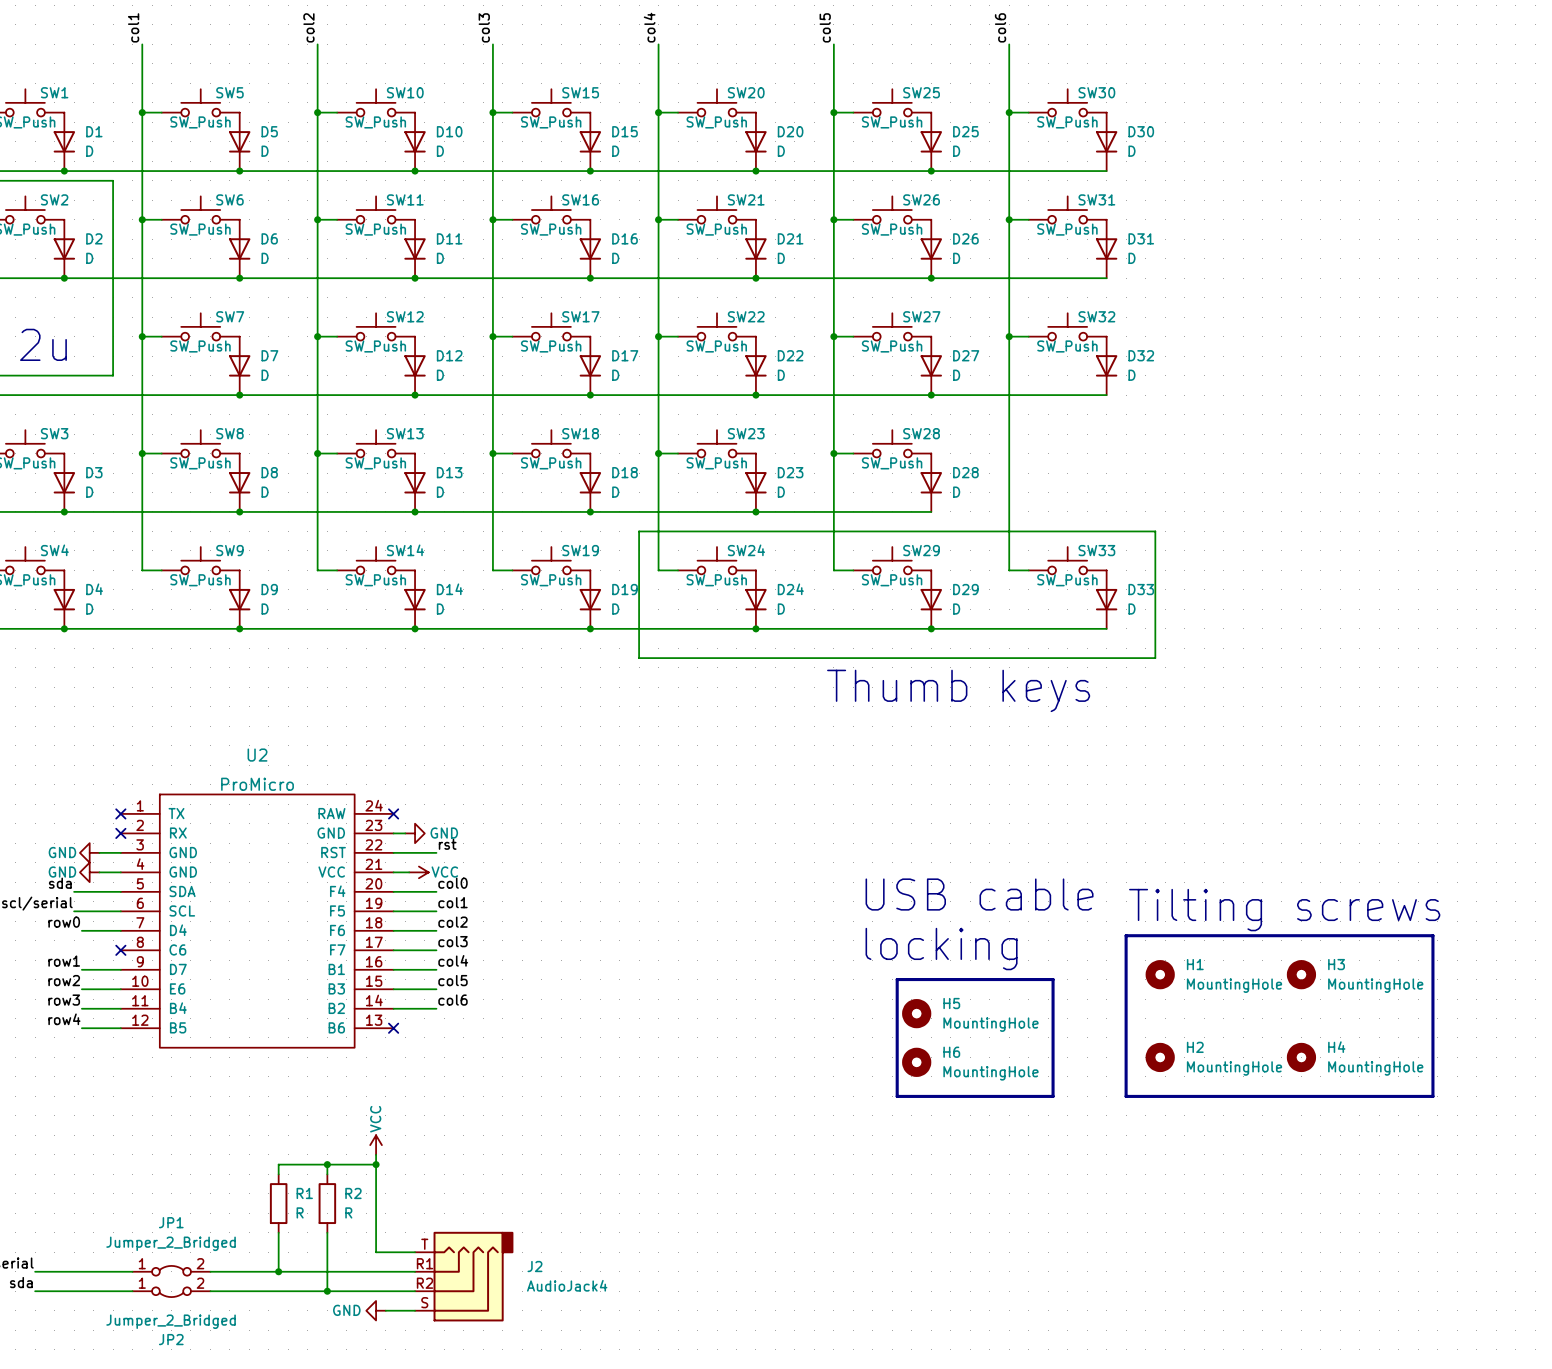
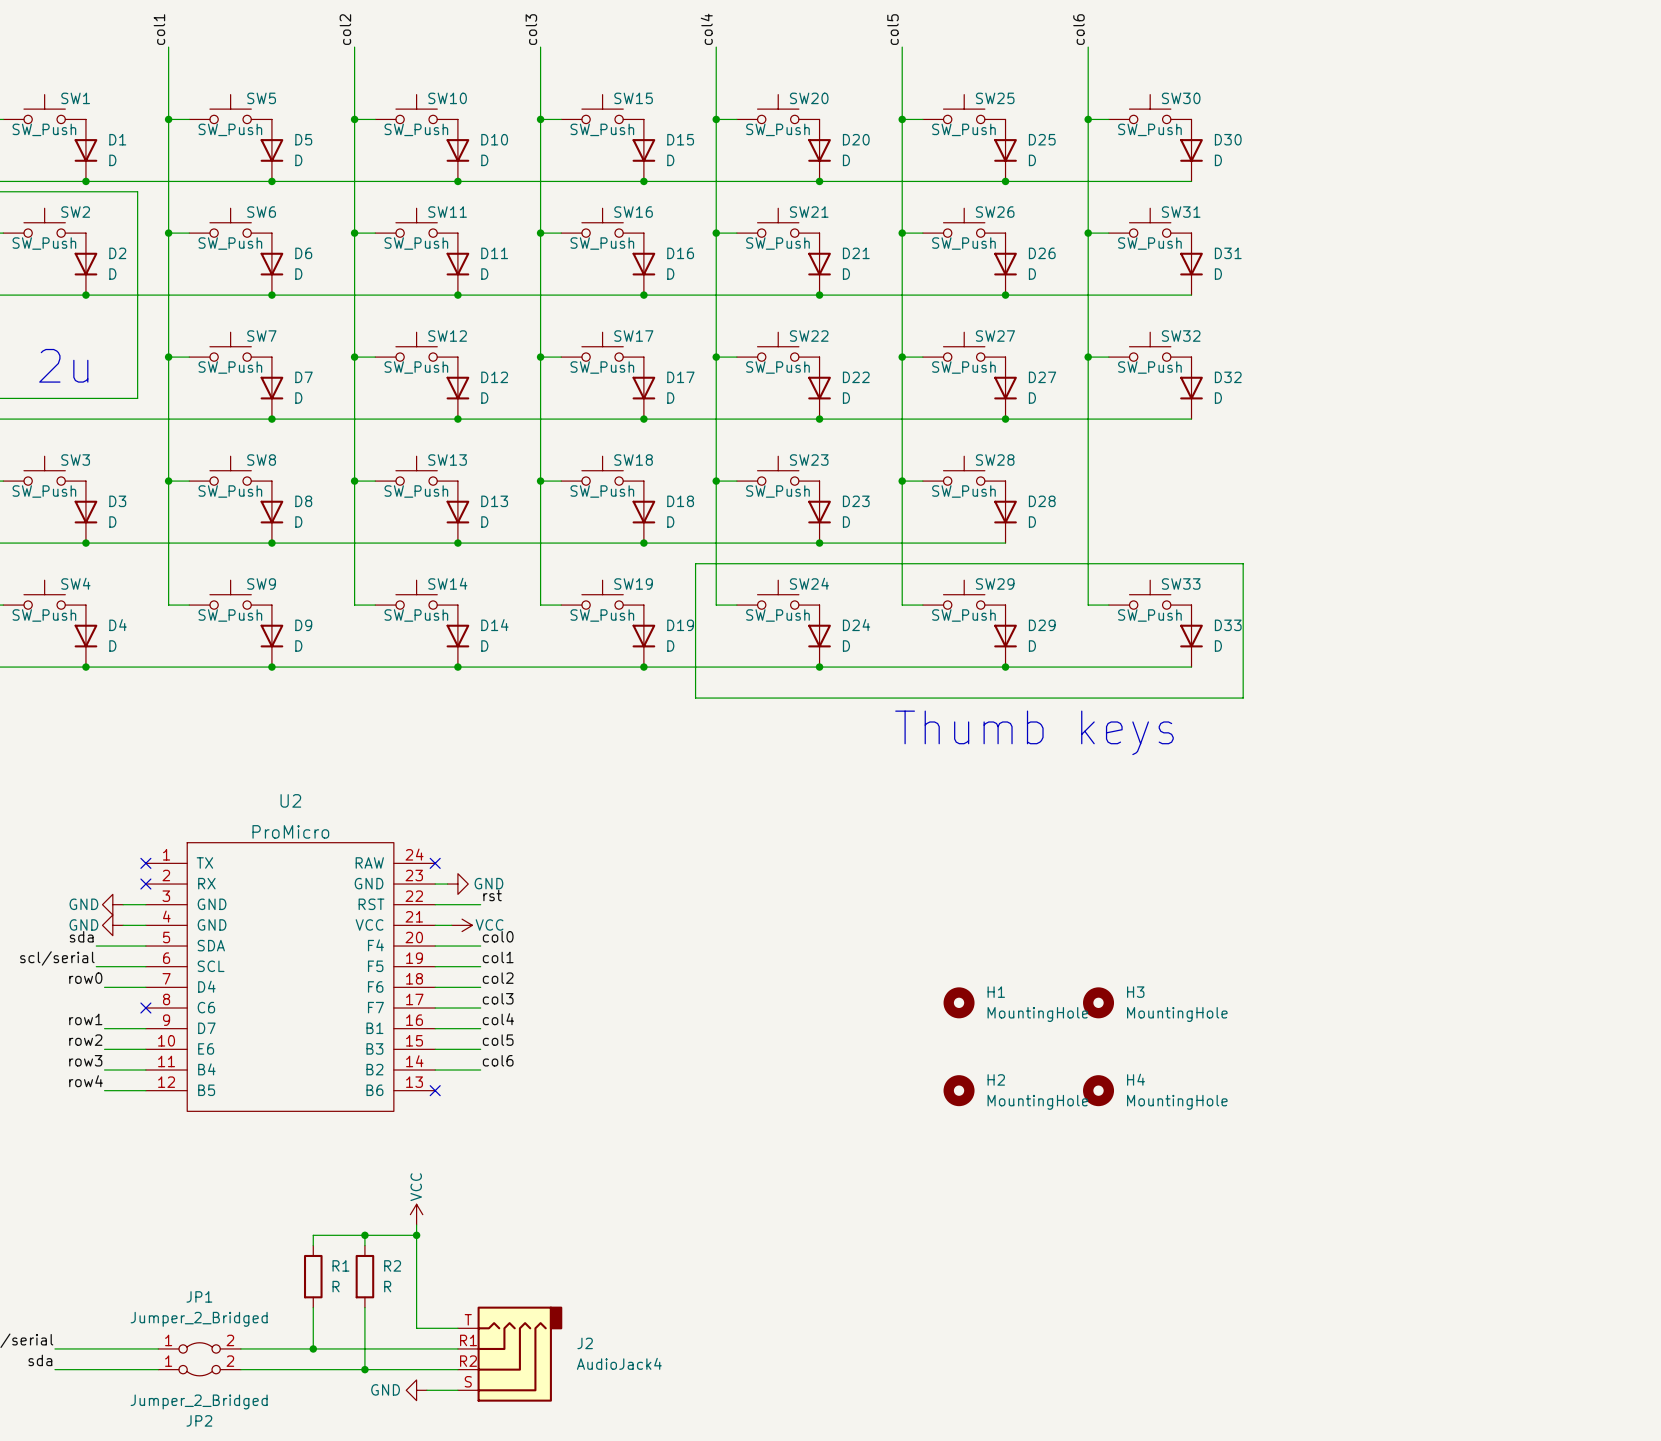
text: USB cable (979, 894) -> none
text: Tilting screws (1284, 910) -> none
line: (1126, 935) (1432, 935) (1432, 1096) (1126, 1096) (1126, 935) -> none
text: locking (941, 949) -> none
H1 position: (1160, 974) -> (959, 1002)
H3 position: (1301, 974) -> (1098, 1002)
line: (897, 979) (897, 1096) (1053, 1096) (1053, 979) (897, 979) -> none
H5: MountingHole (916, 1013) -> none
H2 position: (1160, 1057) -> (959, 1090)
H4 position: (1301, 1057) -> (1098, 1090)
H6: MountingHole (916, 1062) -> none

